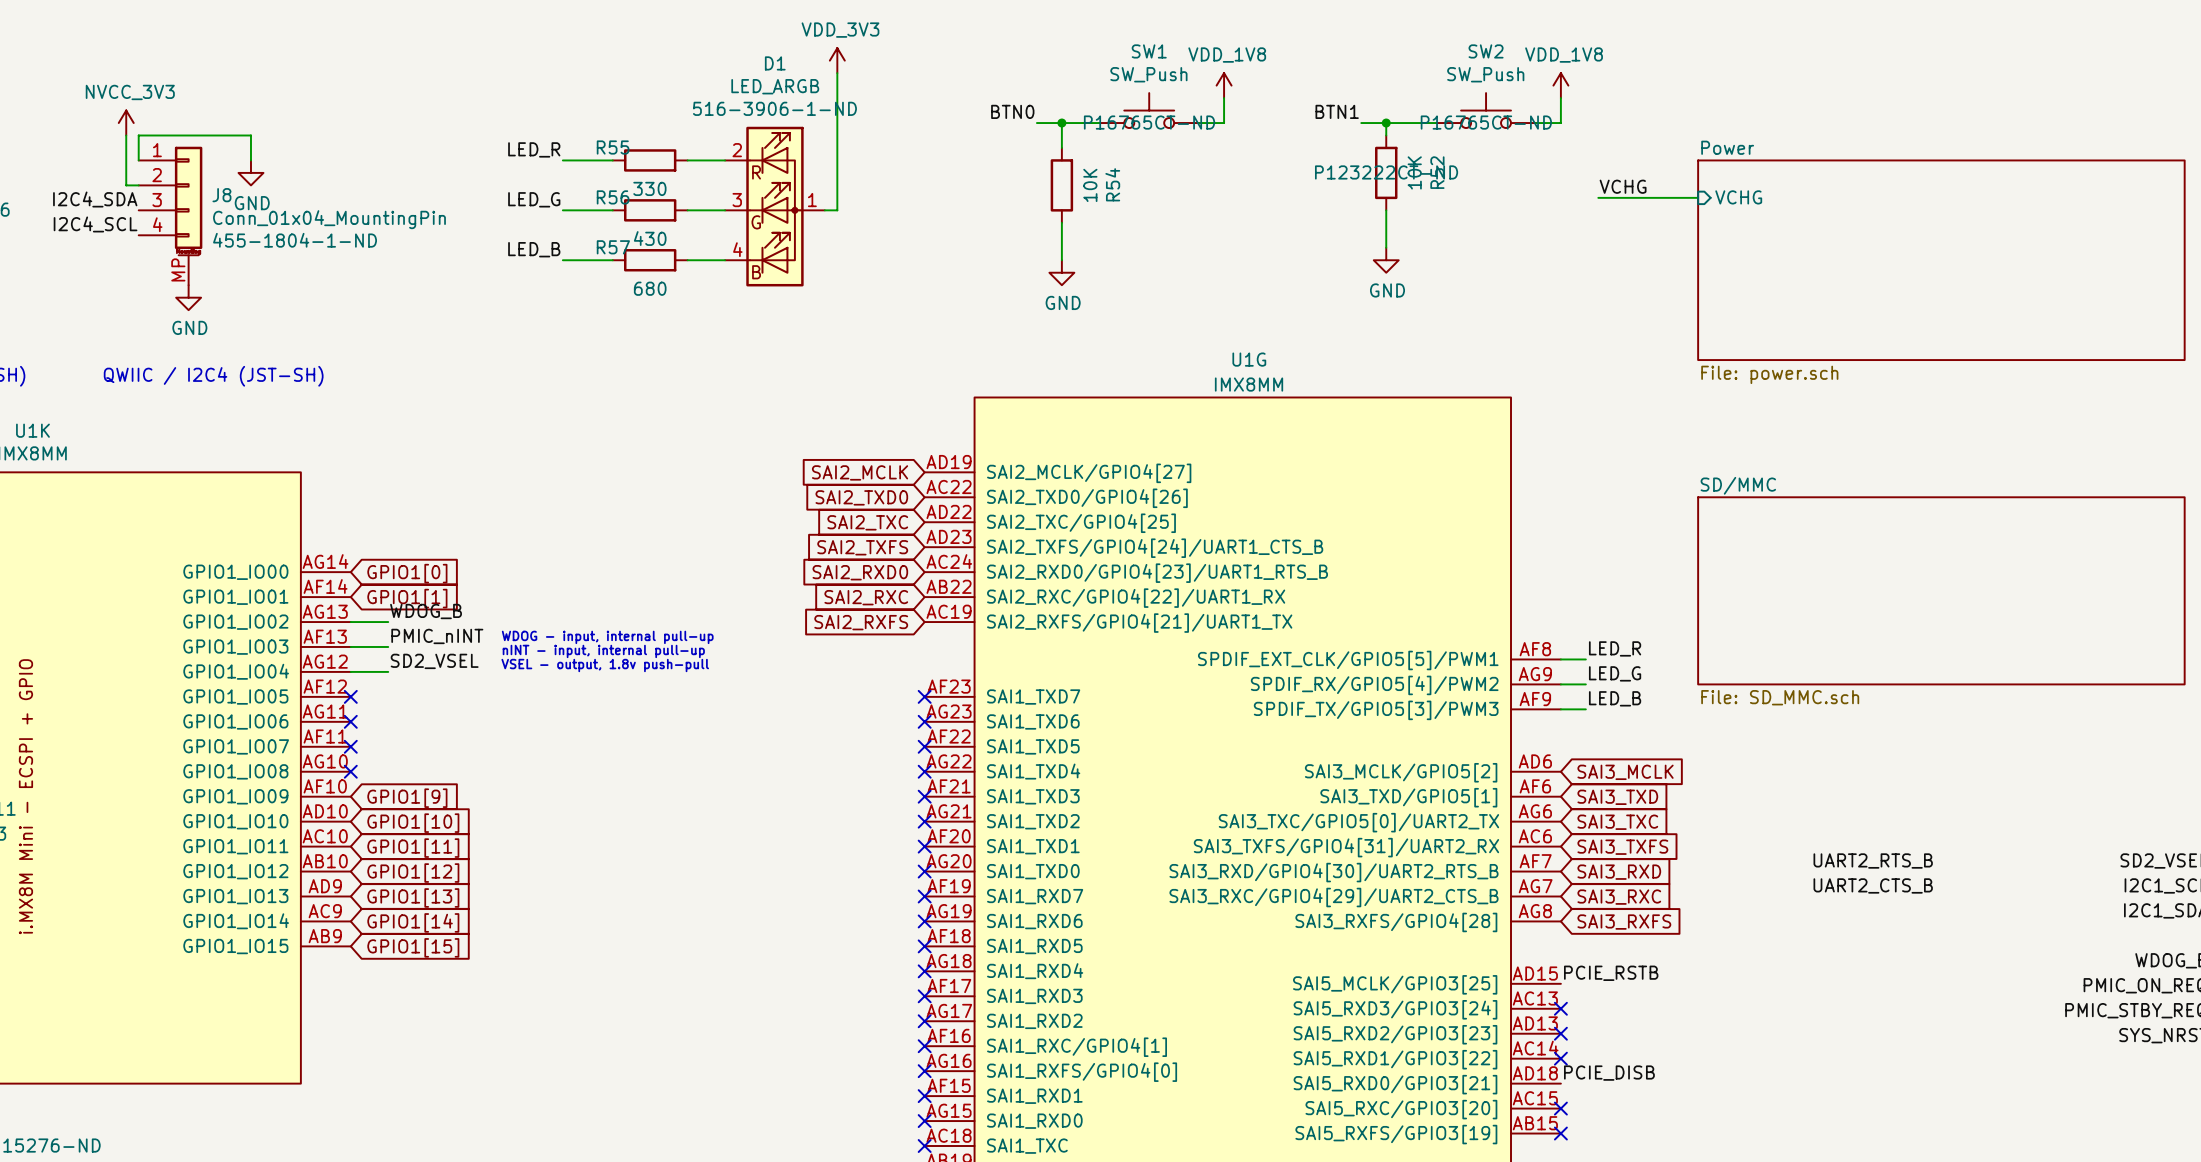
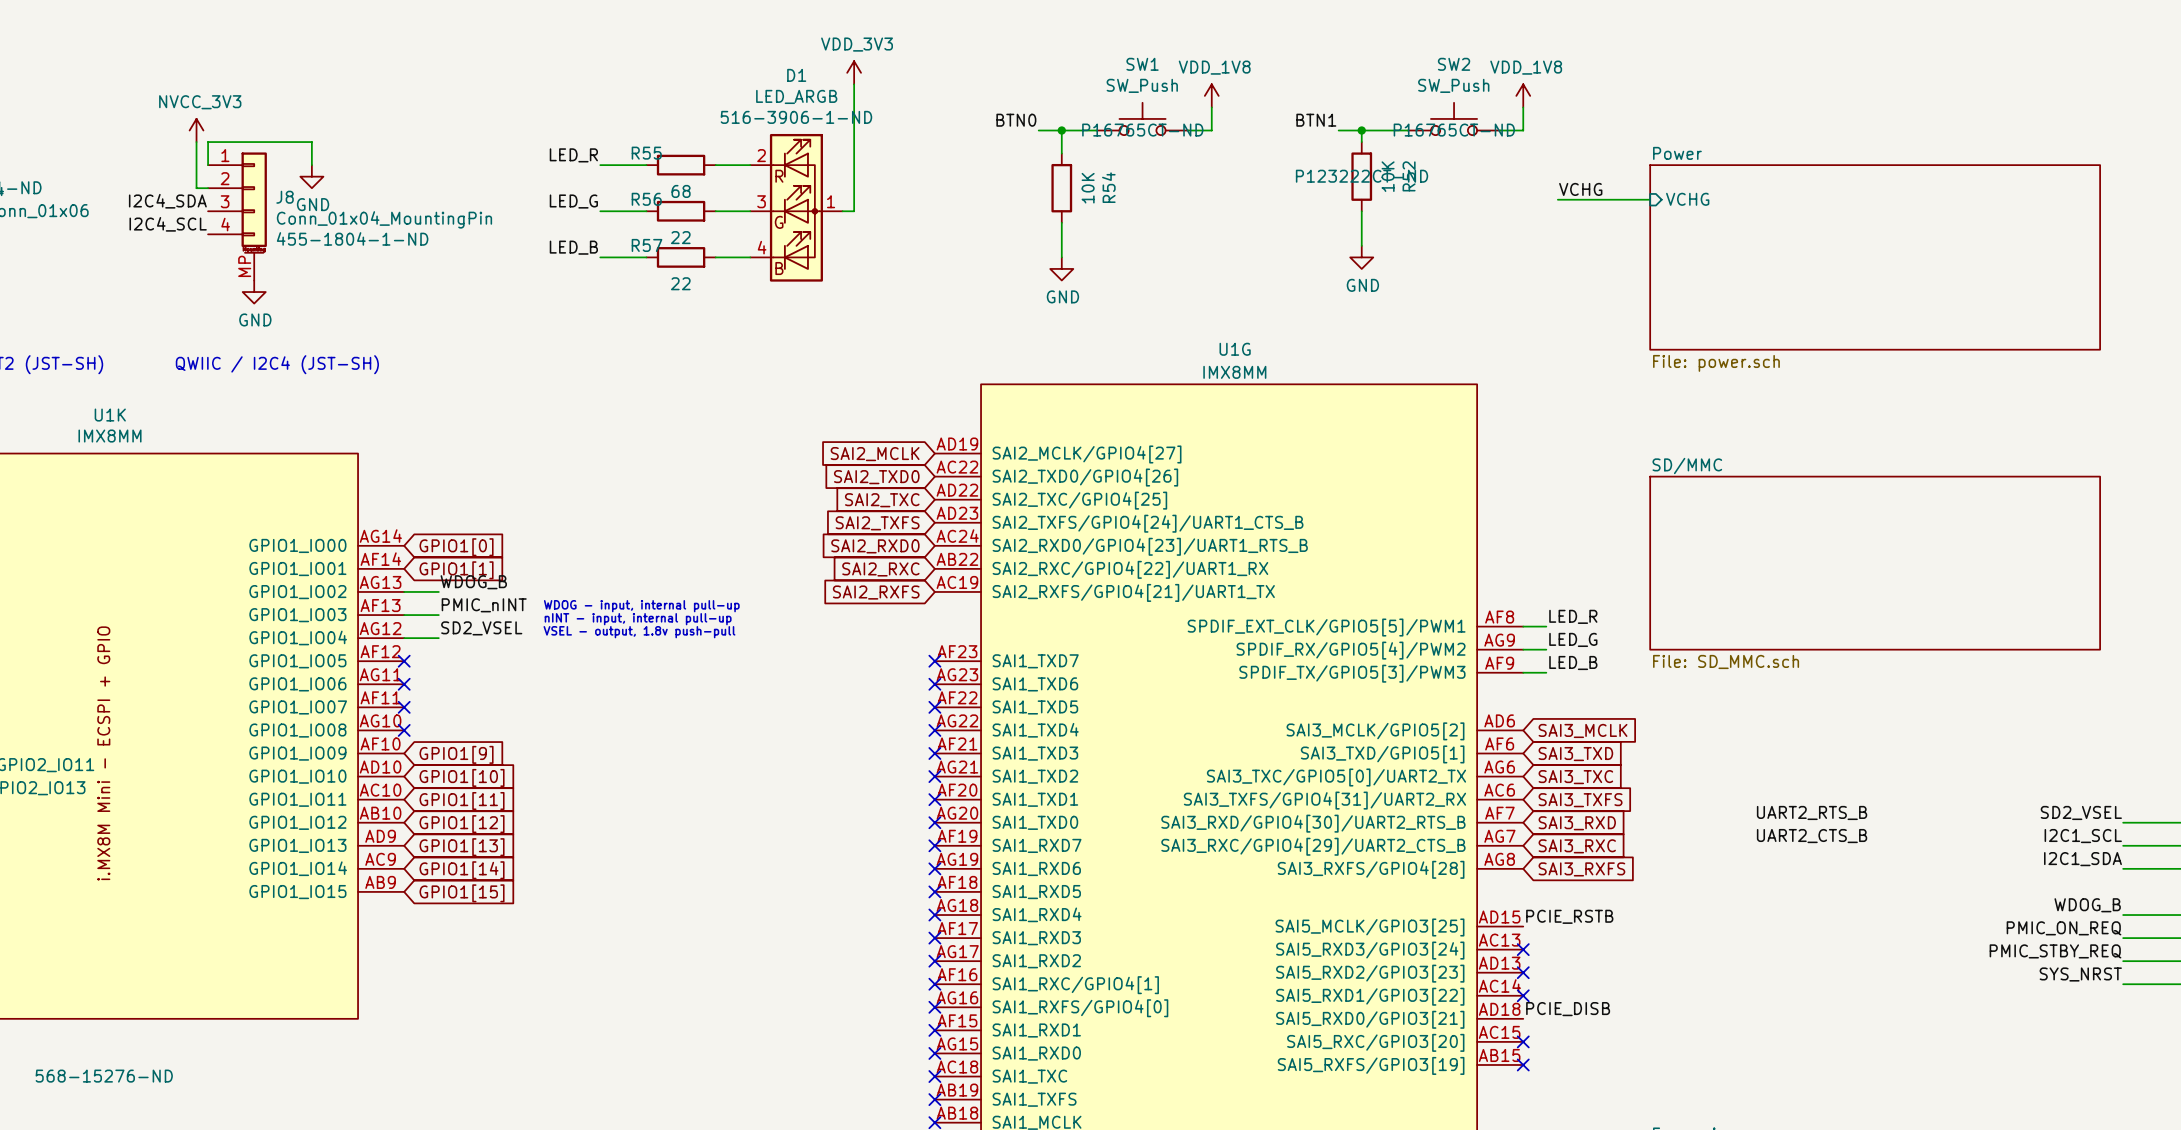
R55 value: 330 (649, 188) -> 68 (681, 191)
R56 value: 430 (650, 238) -> 22 (680, 237)
R57 value: 680 (650, 288) -> 22 (680, 283)

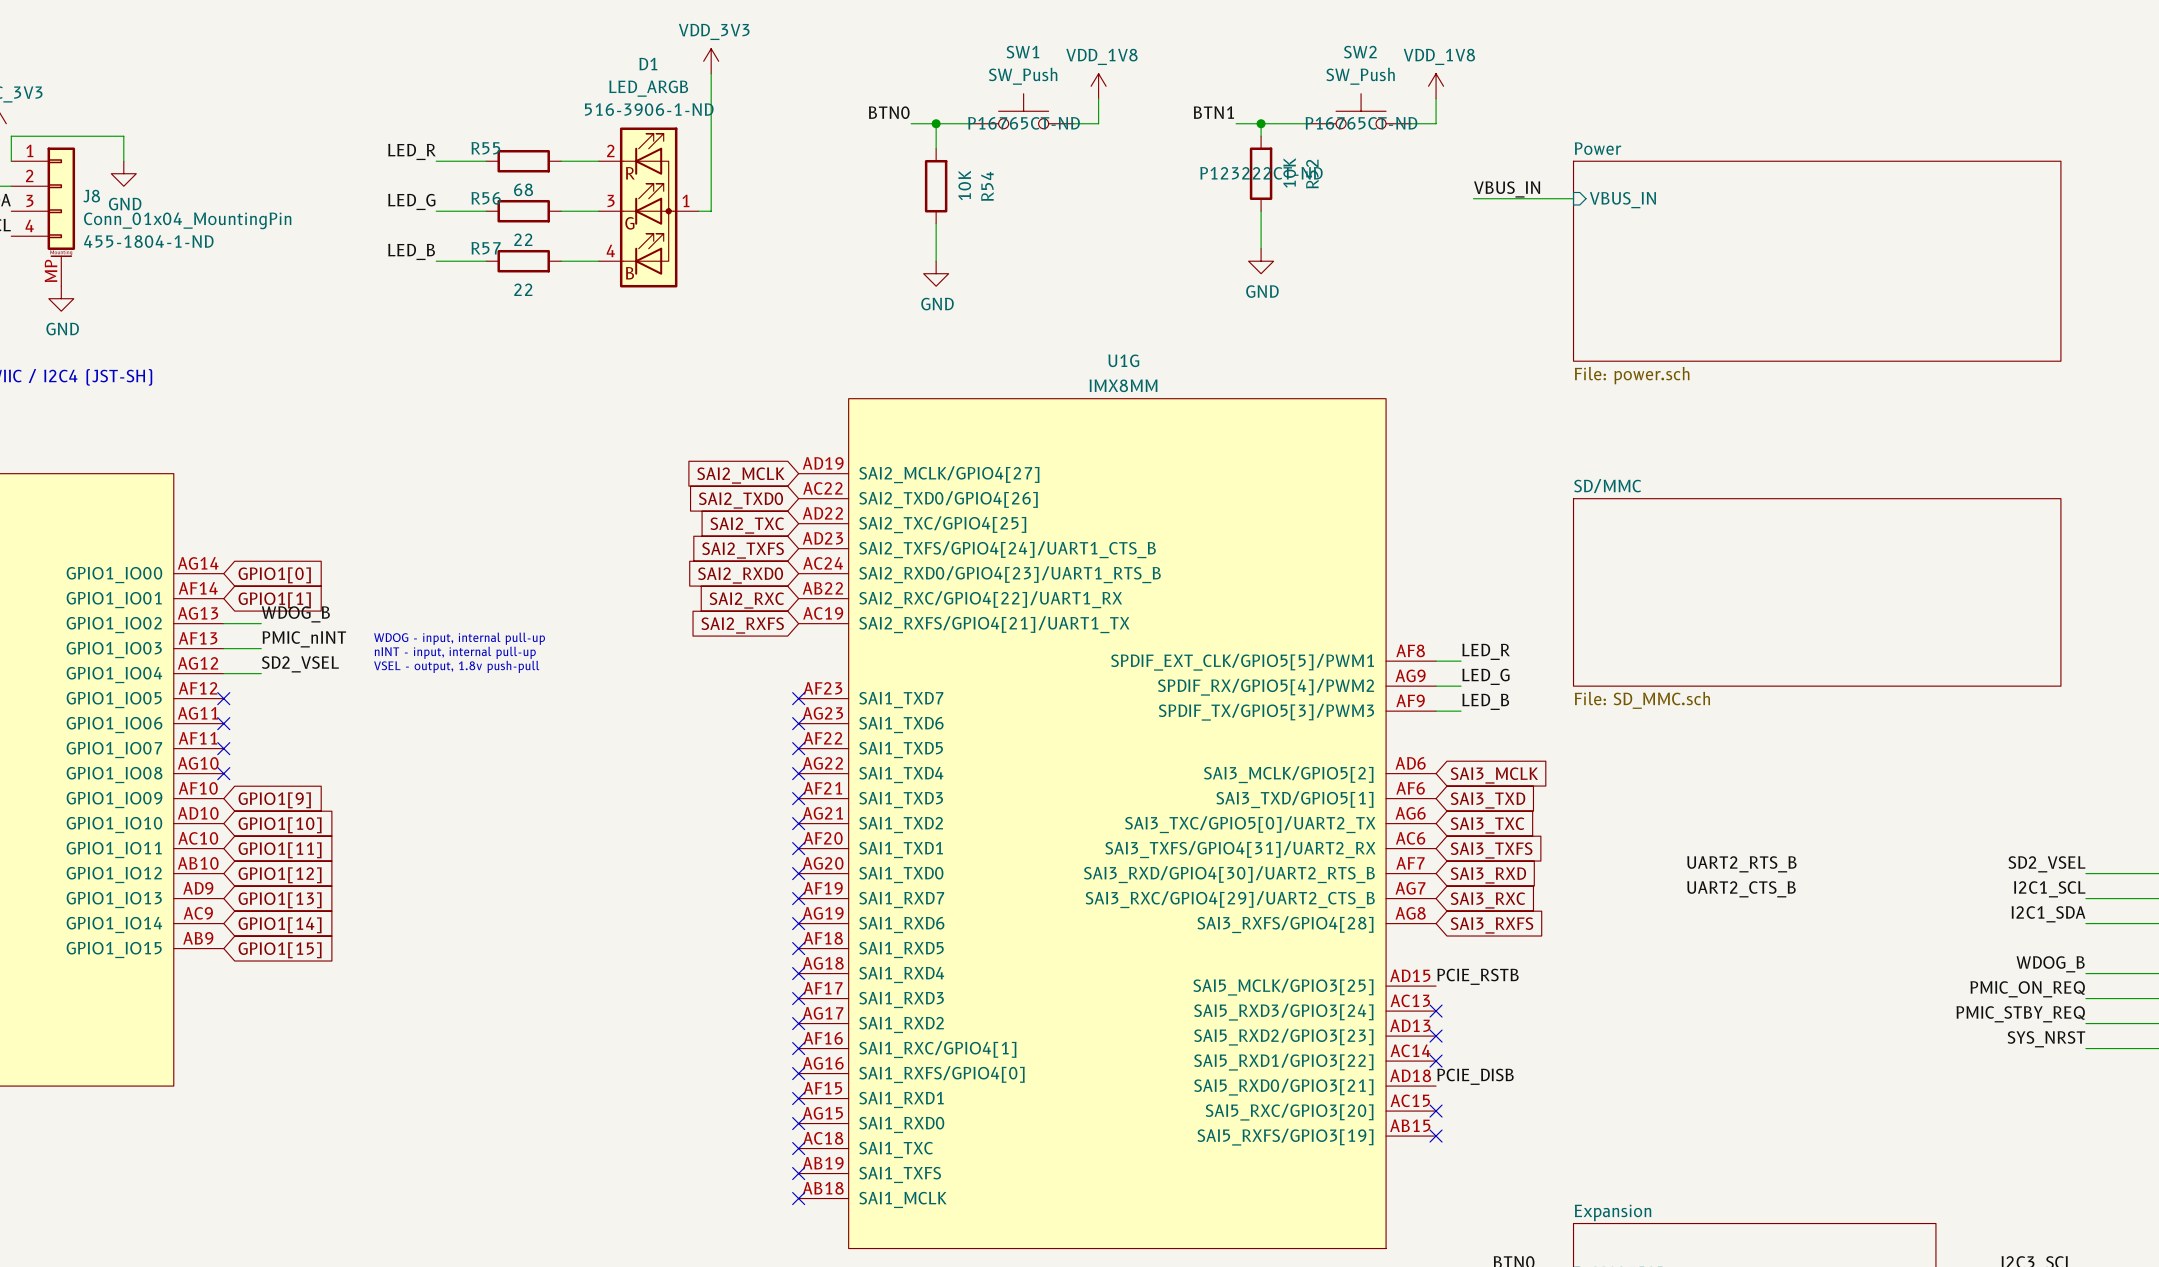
label: VCHG (1580, 189) -> VBUS_IN (1507, 189)
sheet pin: VCHG (1687, 199) -> VBUS_IN (1622, 200)

